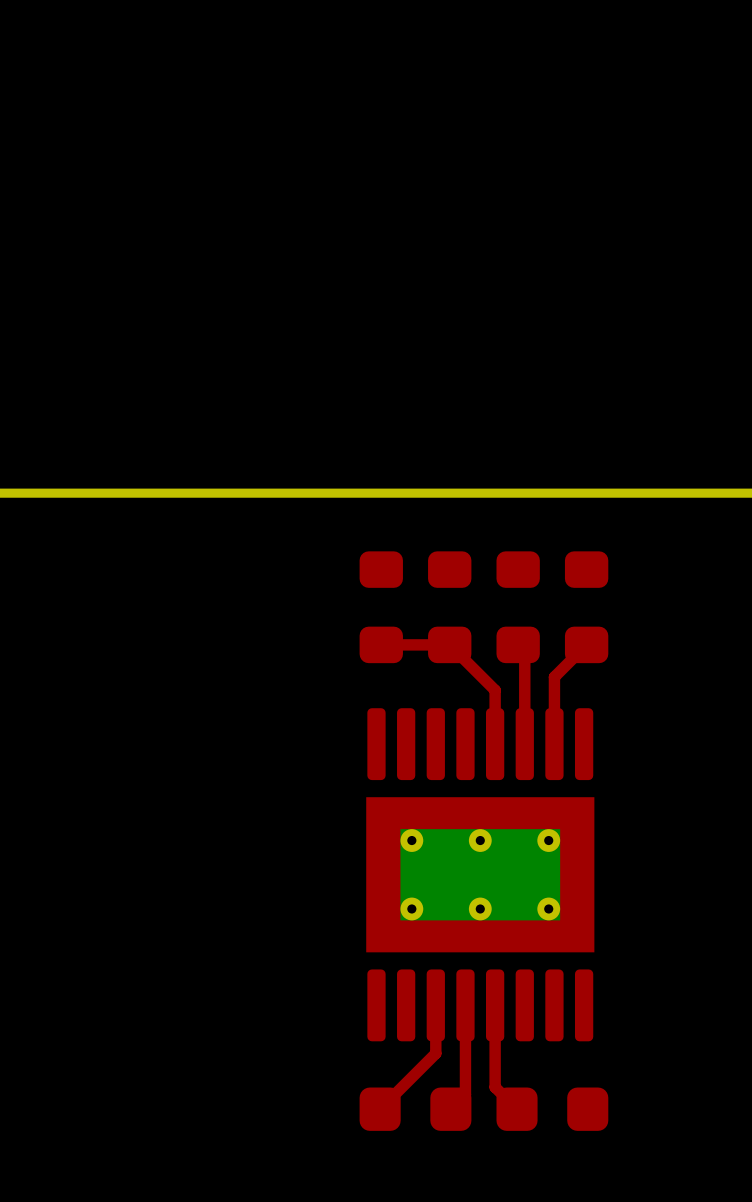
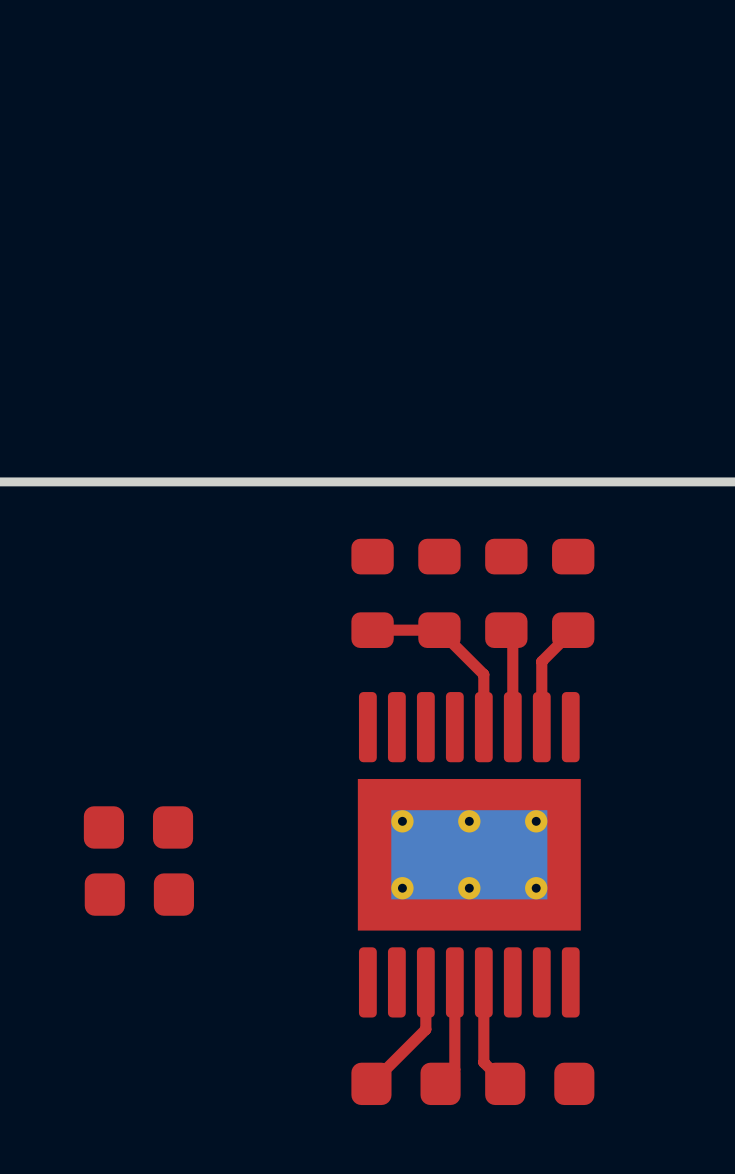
part: none -> (138, 827)
part: none -> (139, 894)

